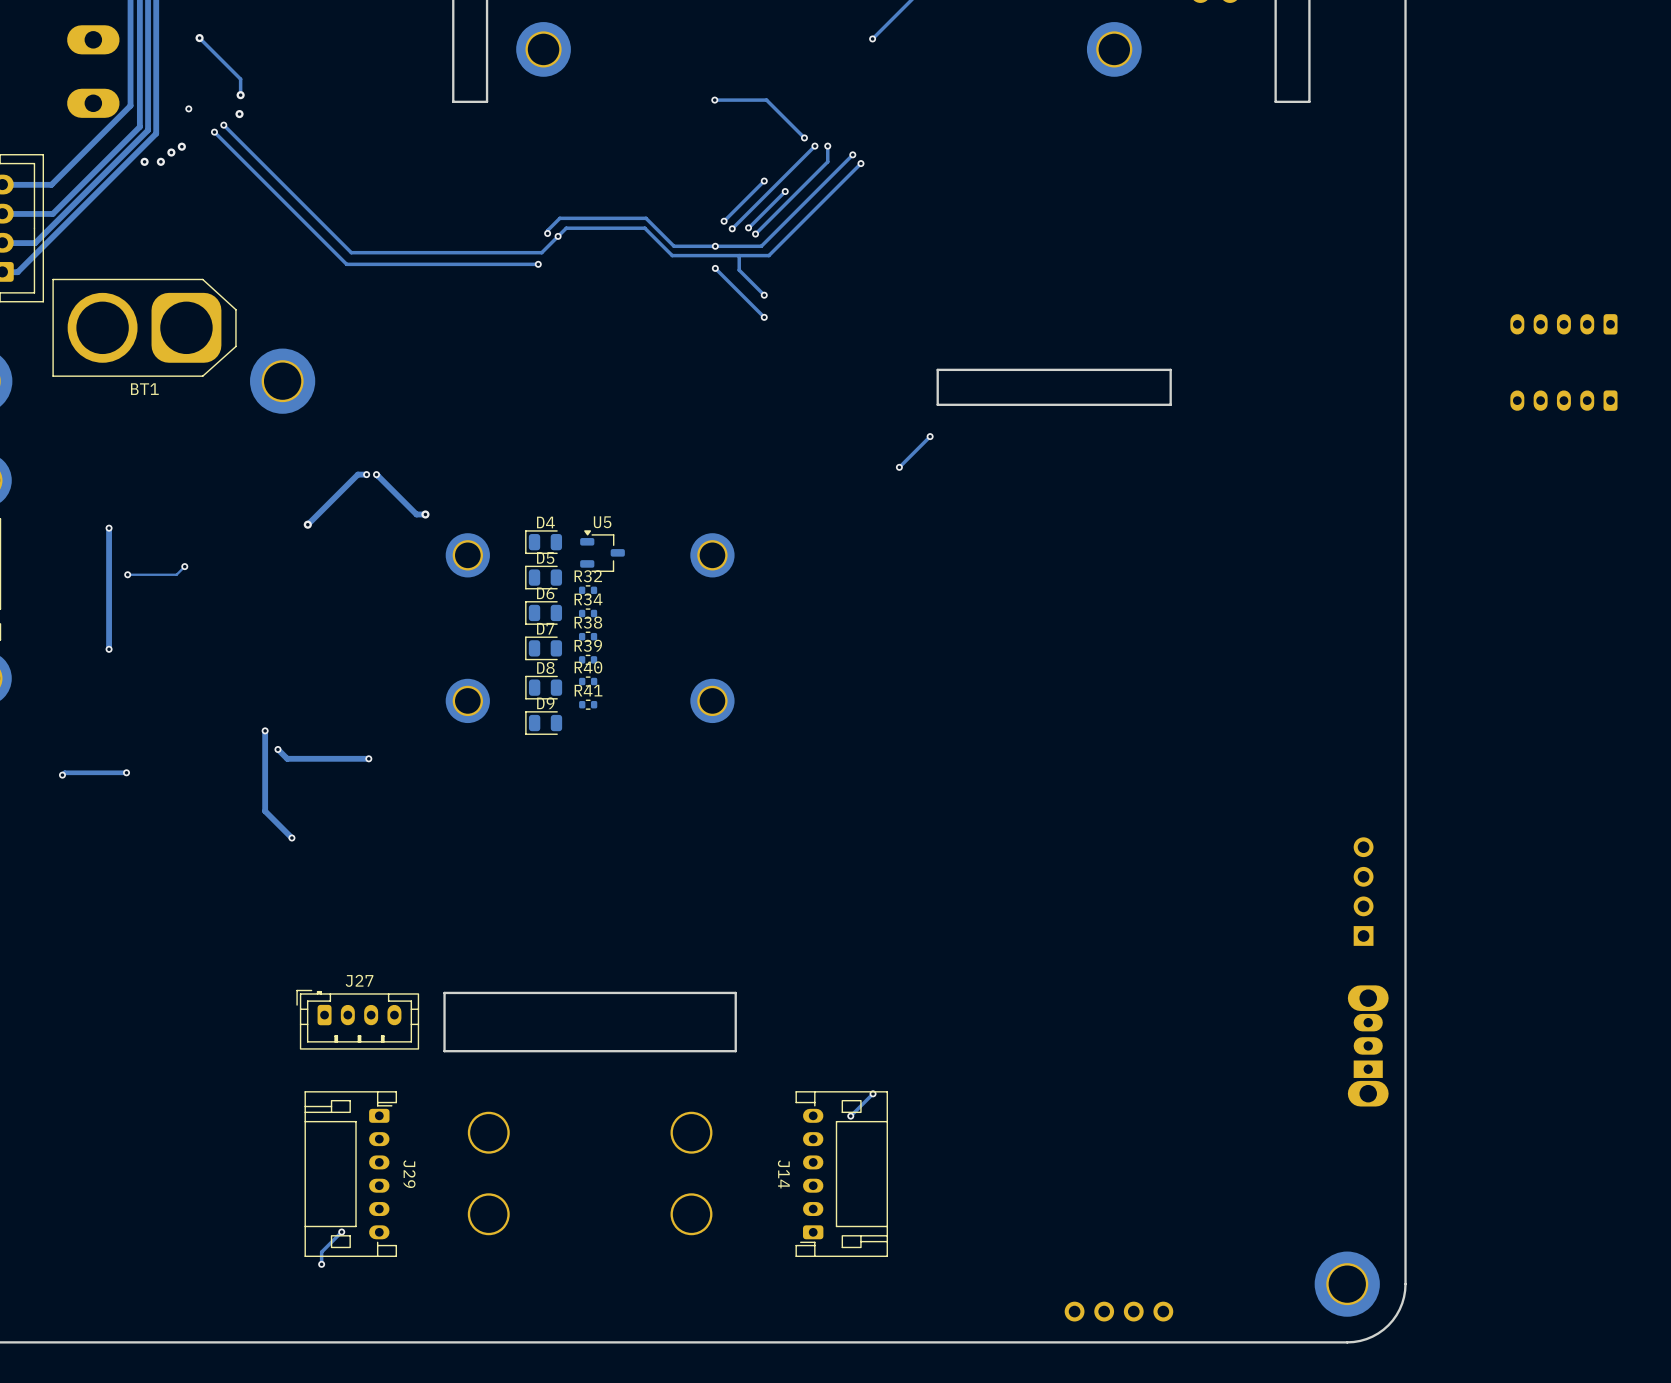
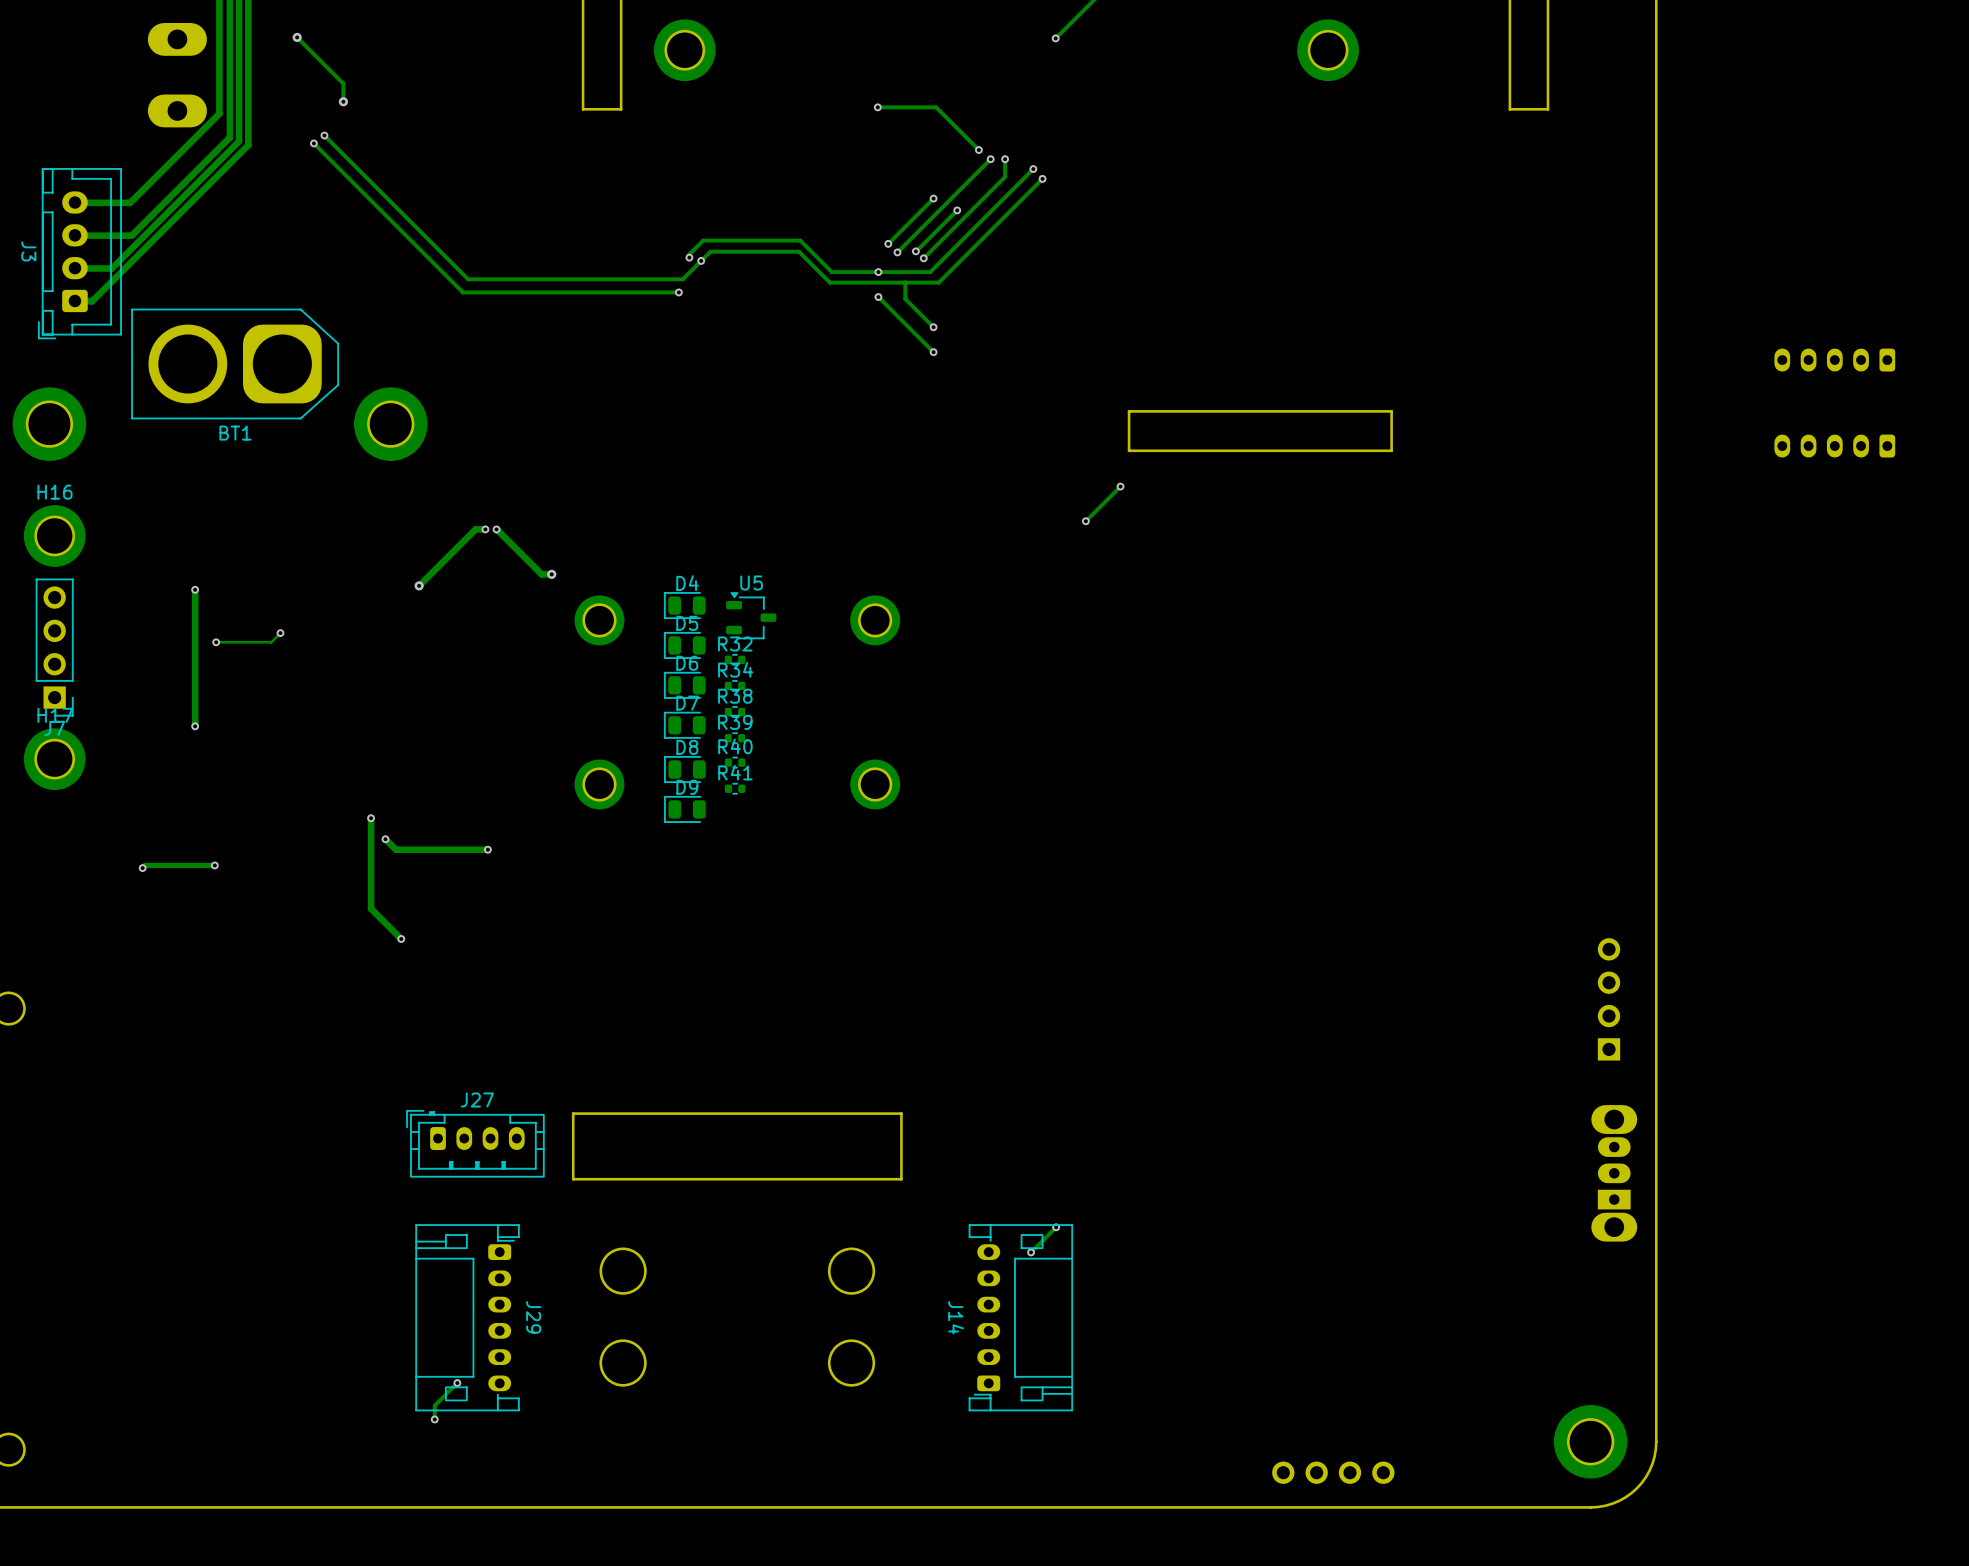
via: (188, 108) -> none
via: (239, 114) -> none
via: (181, 146) -> none
via: (171, 152) -> none
via: (144, 161) -> none
via: (160, 161) -> none

